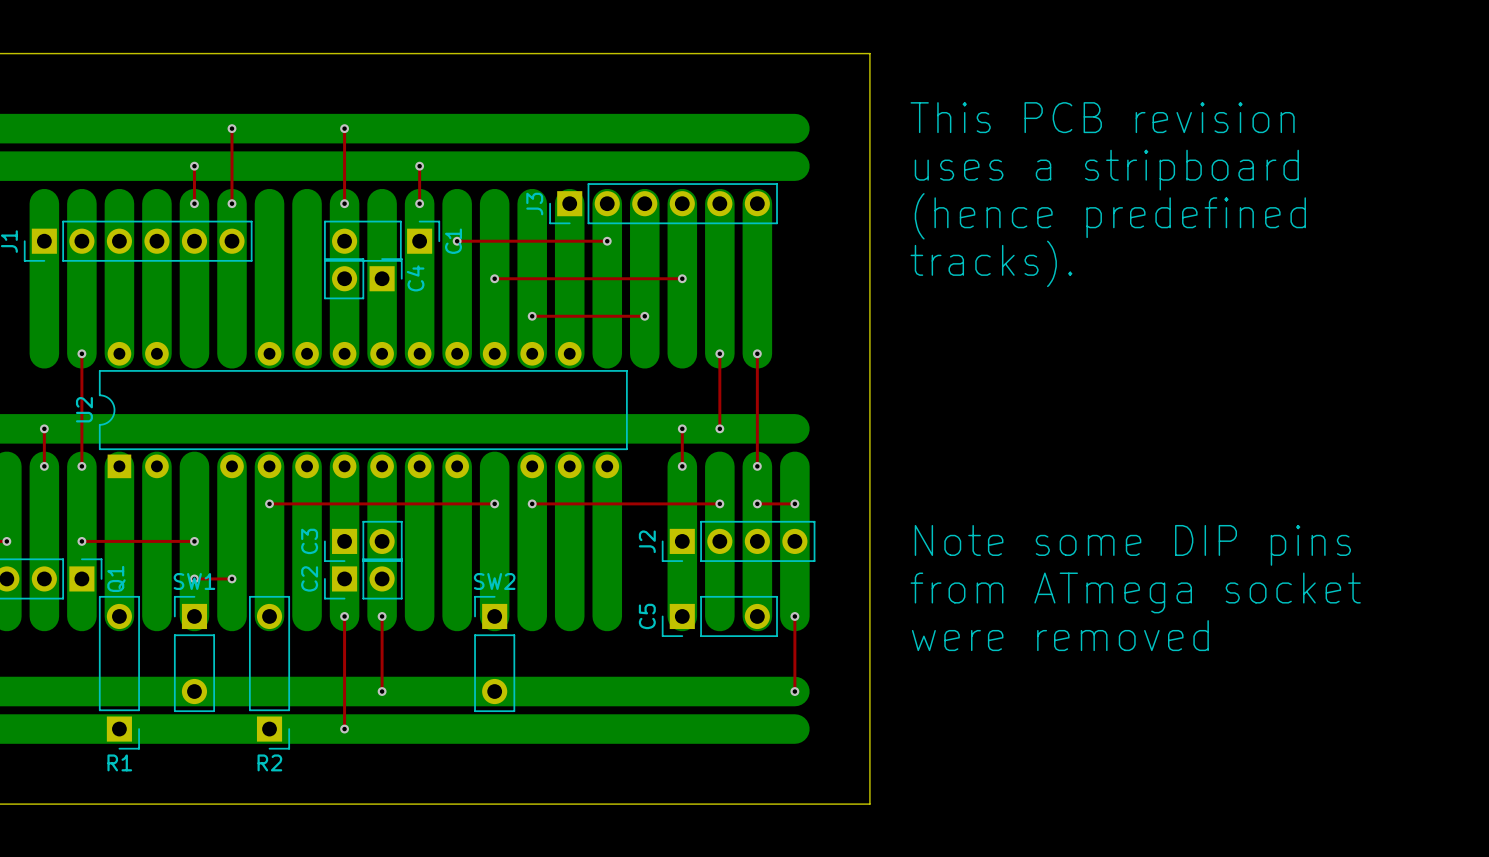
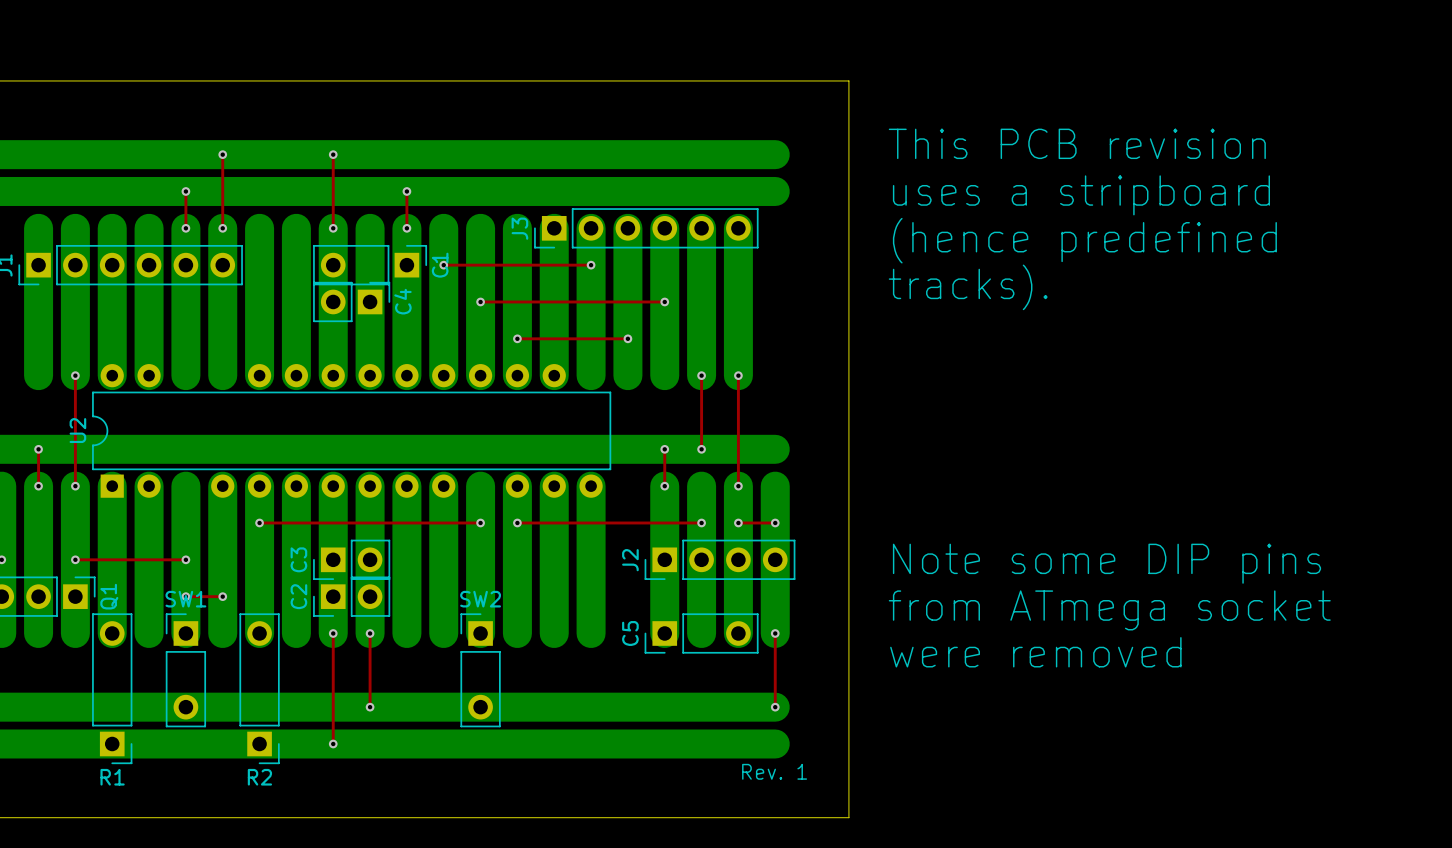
text: none -> Rev. 1 (774, 771)

